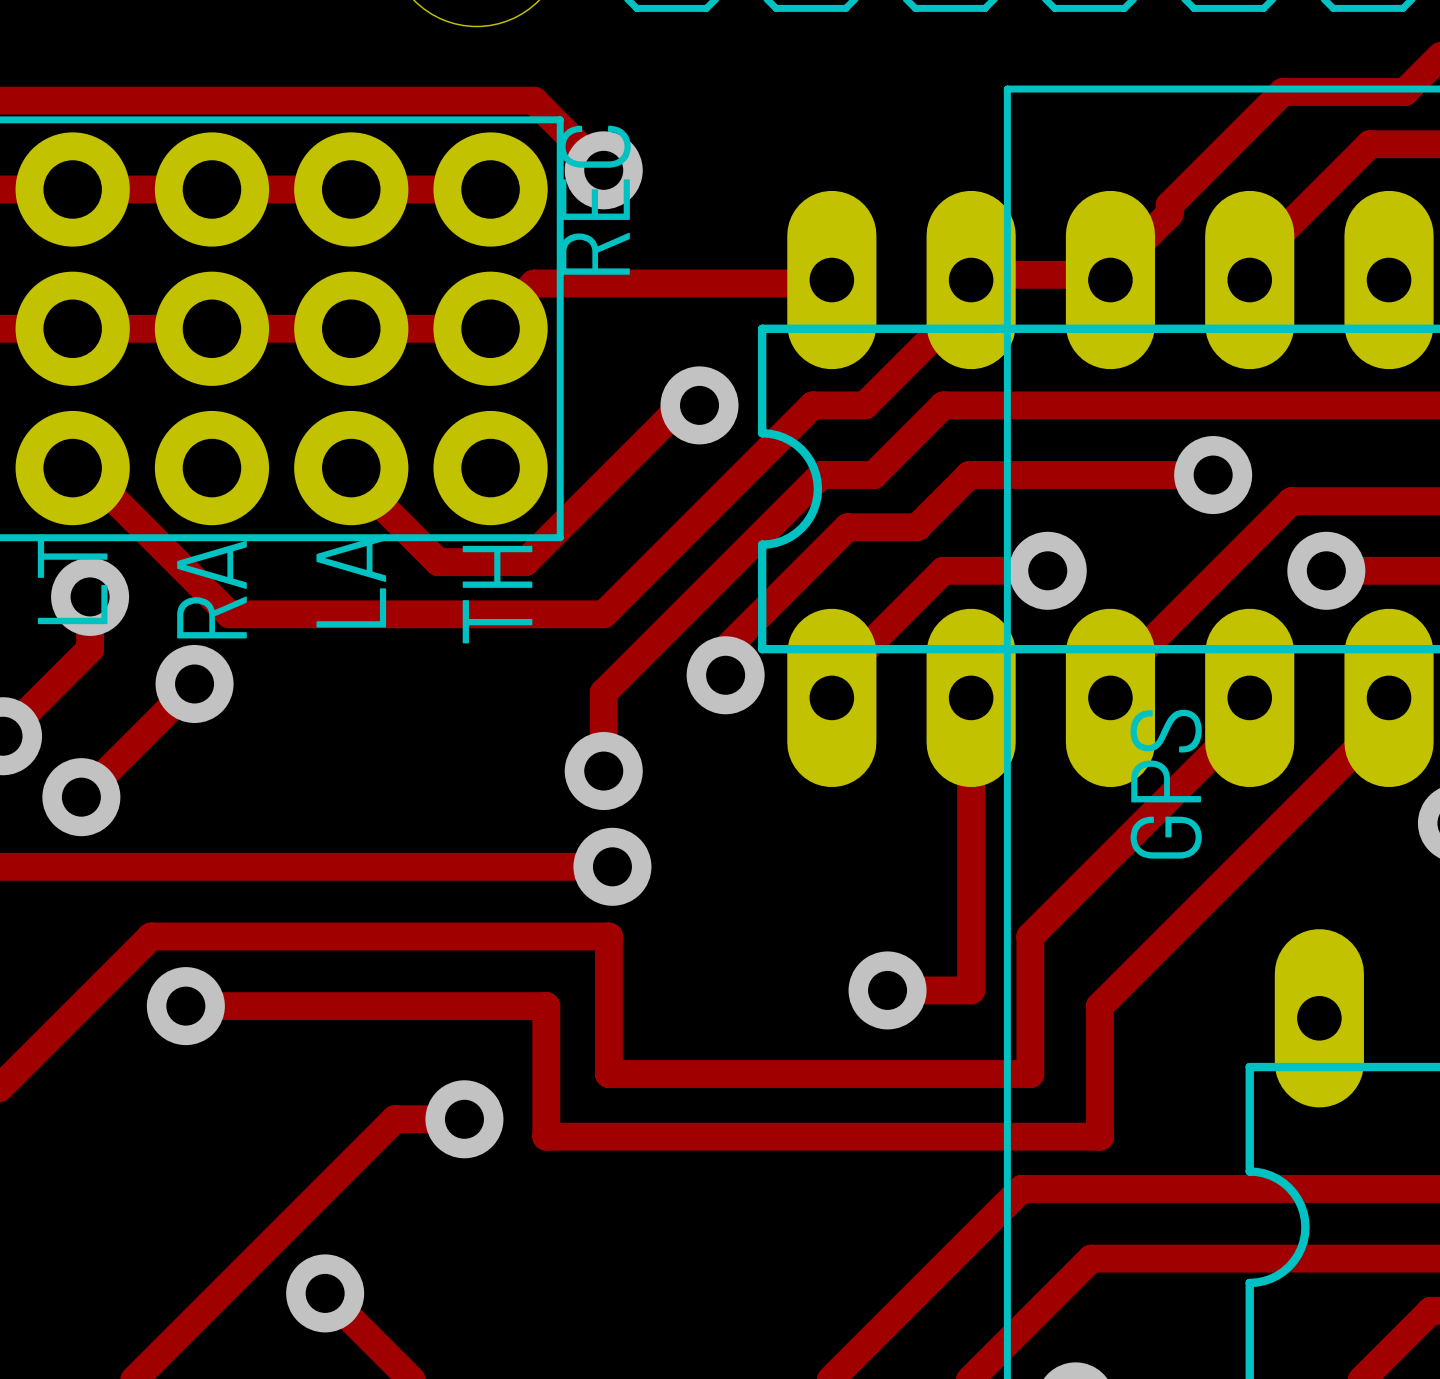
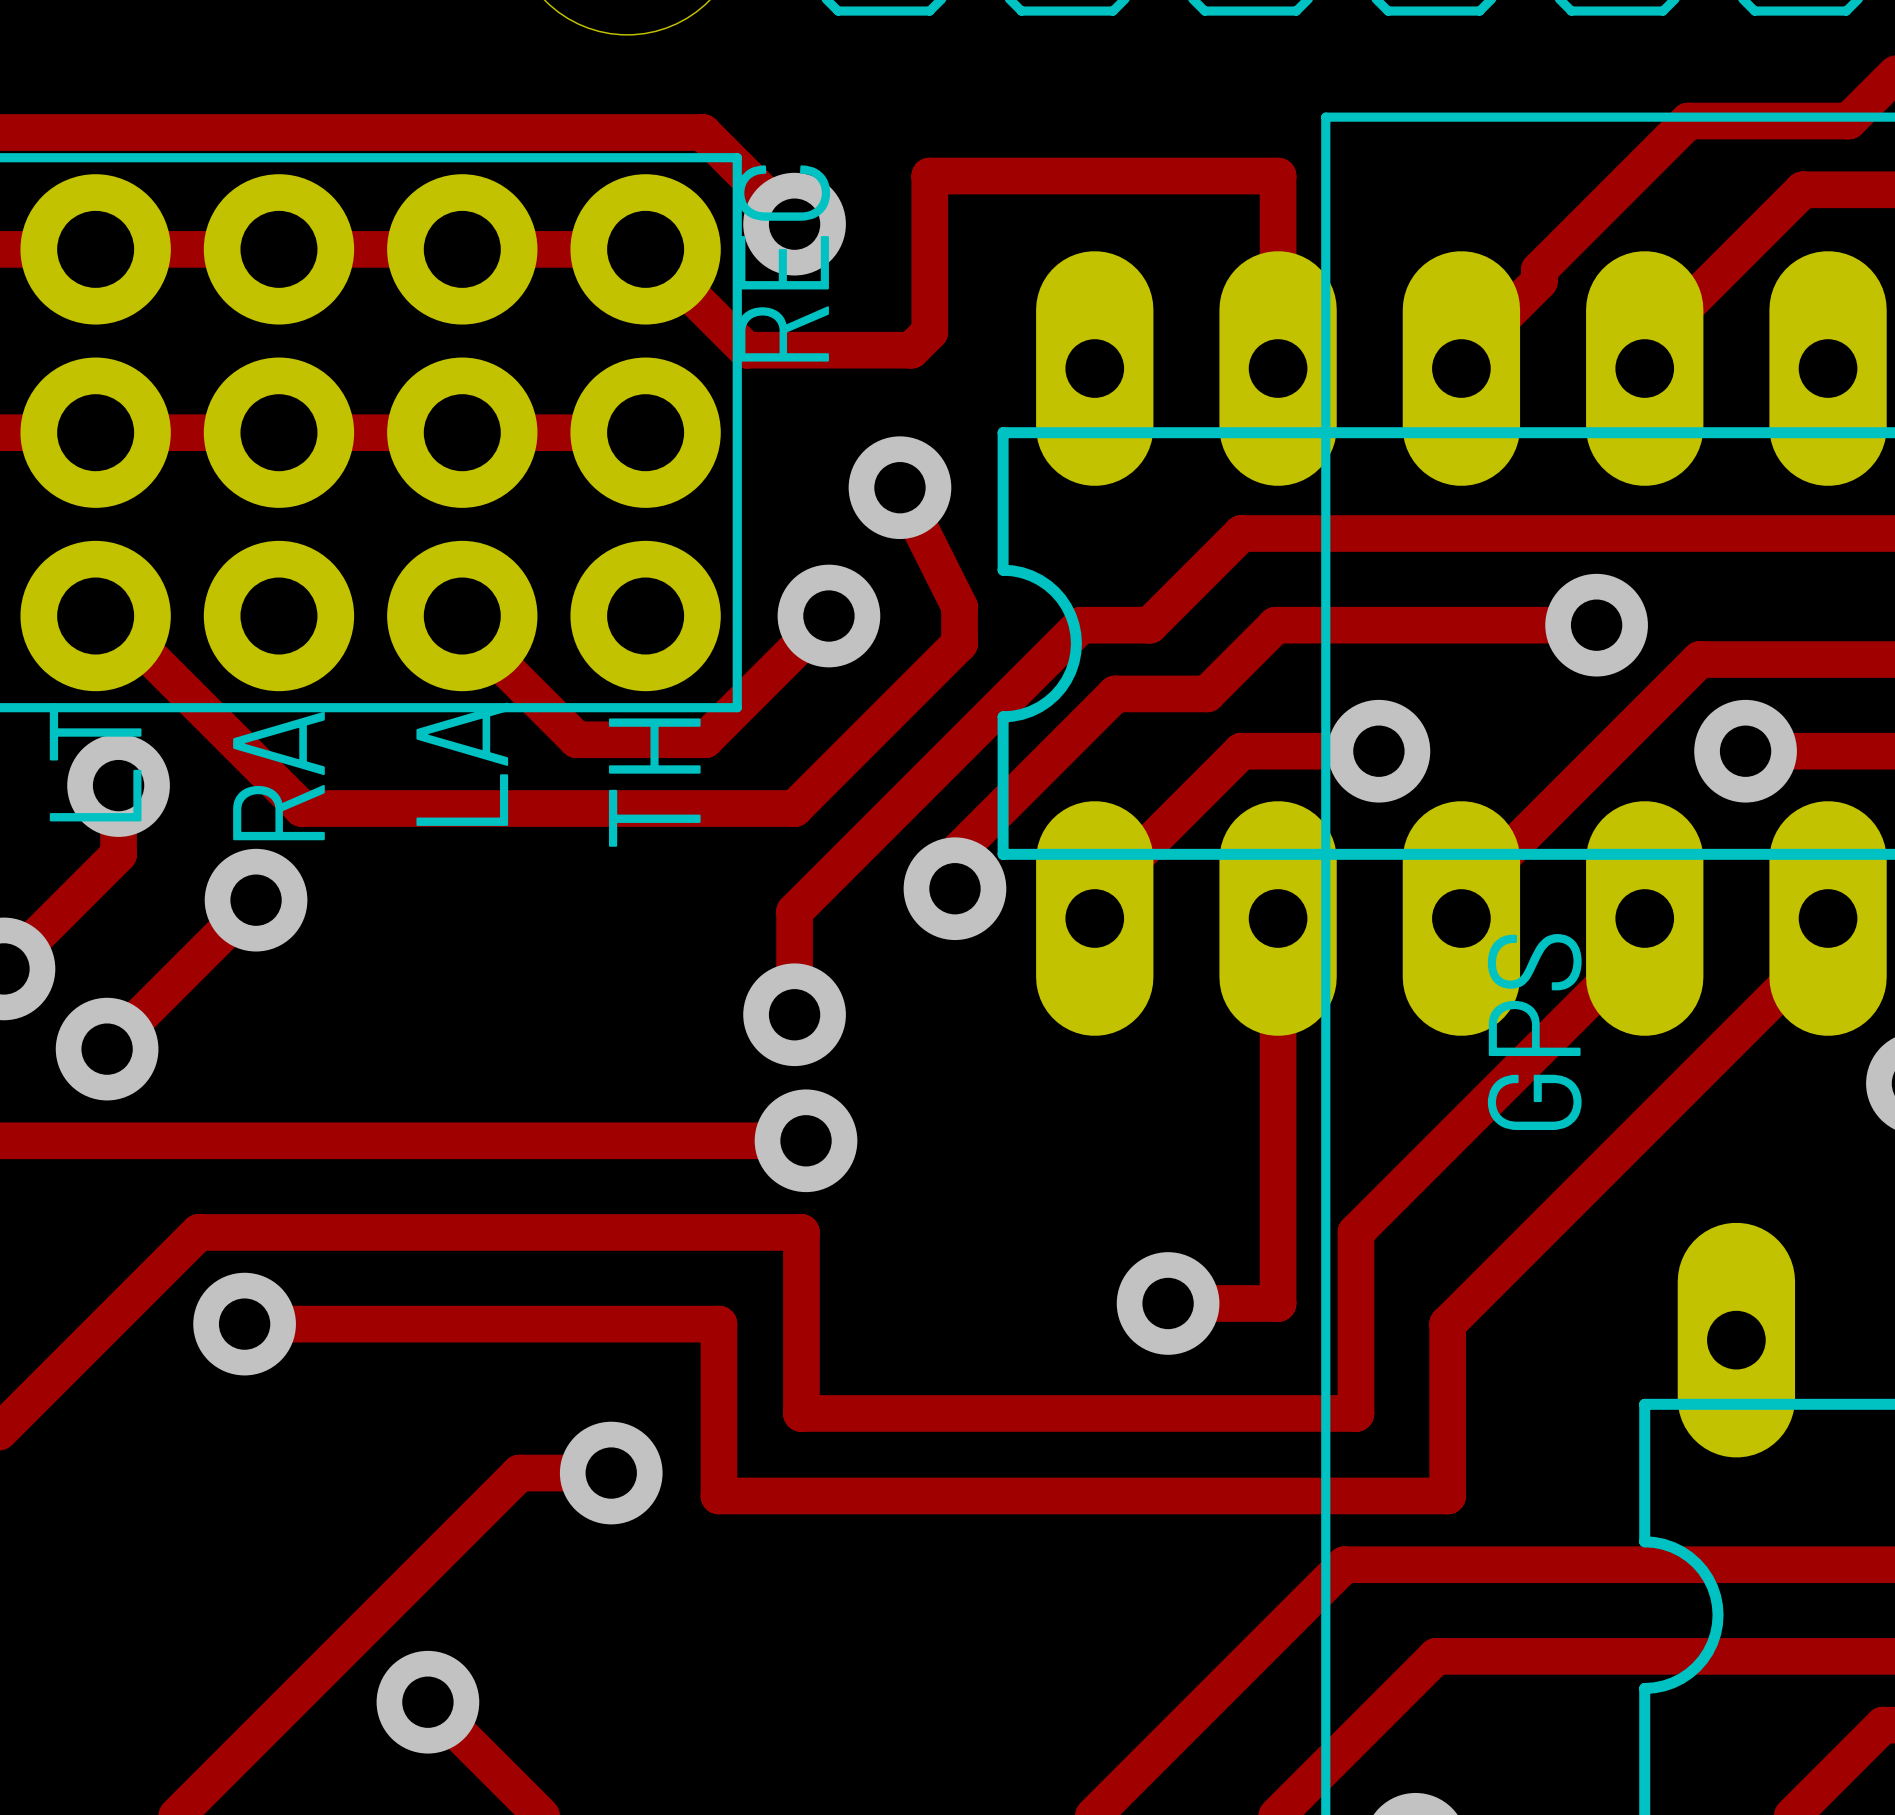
track: none -> (645, 249) (746, 350) (911, 350) (929, 331) (929, 176) (1278, 176) (1278, 368)
track: (1108, 274) (978, 274) (971, 280) (986, 283) (864, 405) (812, 405) (729, 488) -> (899, 487) (959, 606) (959, 643)
track: (831, 280) (830, 283) (534, 283) (490, 328) -> none
track: (699, 405) (682, 405) (525, 562) -> (828, 616) (705, 739) (691, 739)
via position: (699, 405) -> (899, 487)
via: none -> (828, 616)

